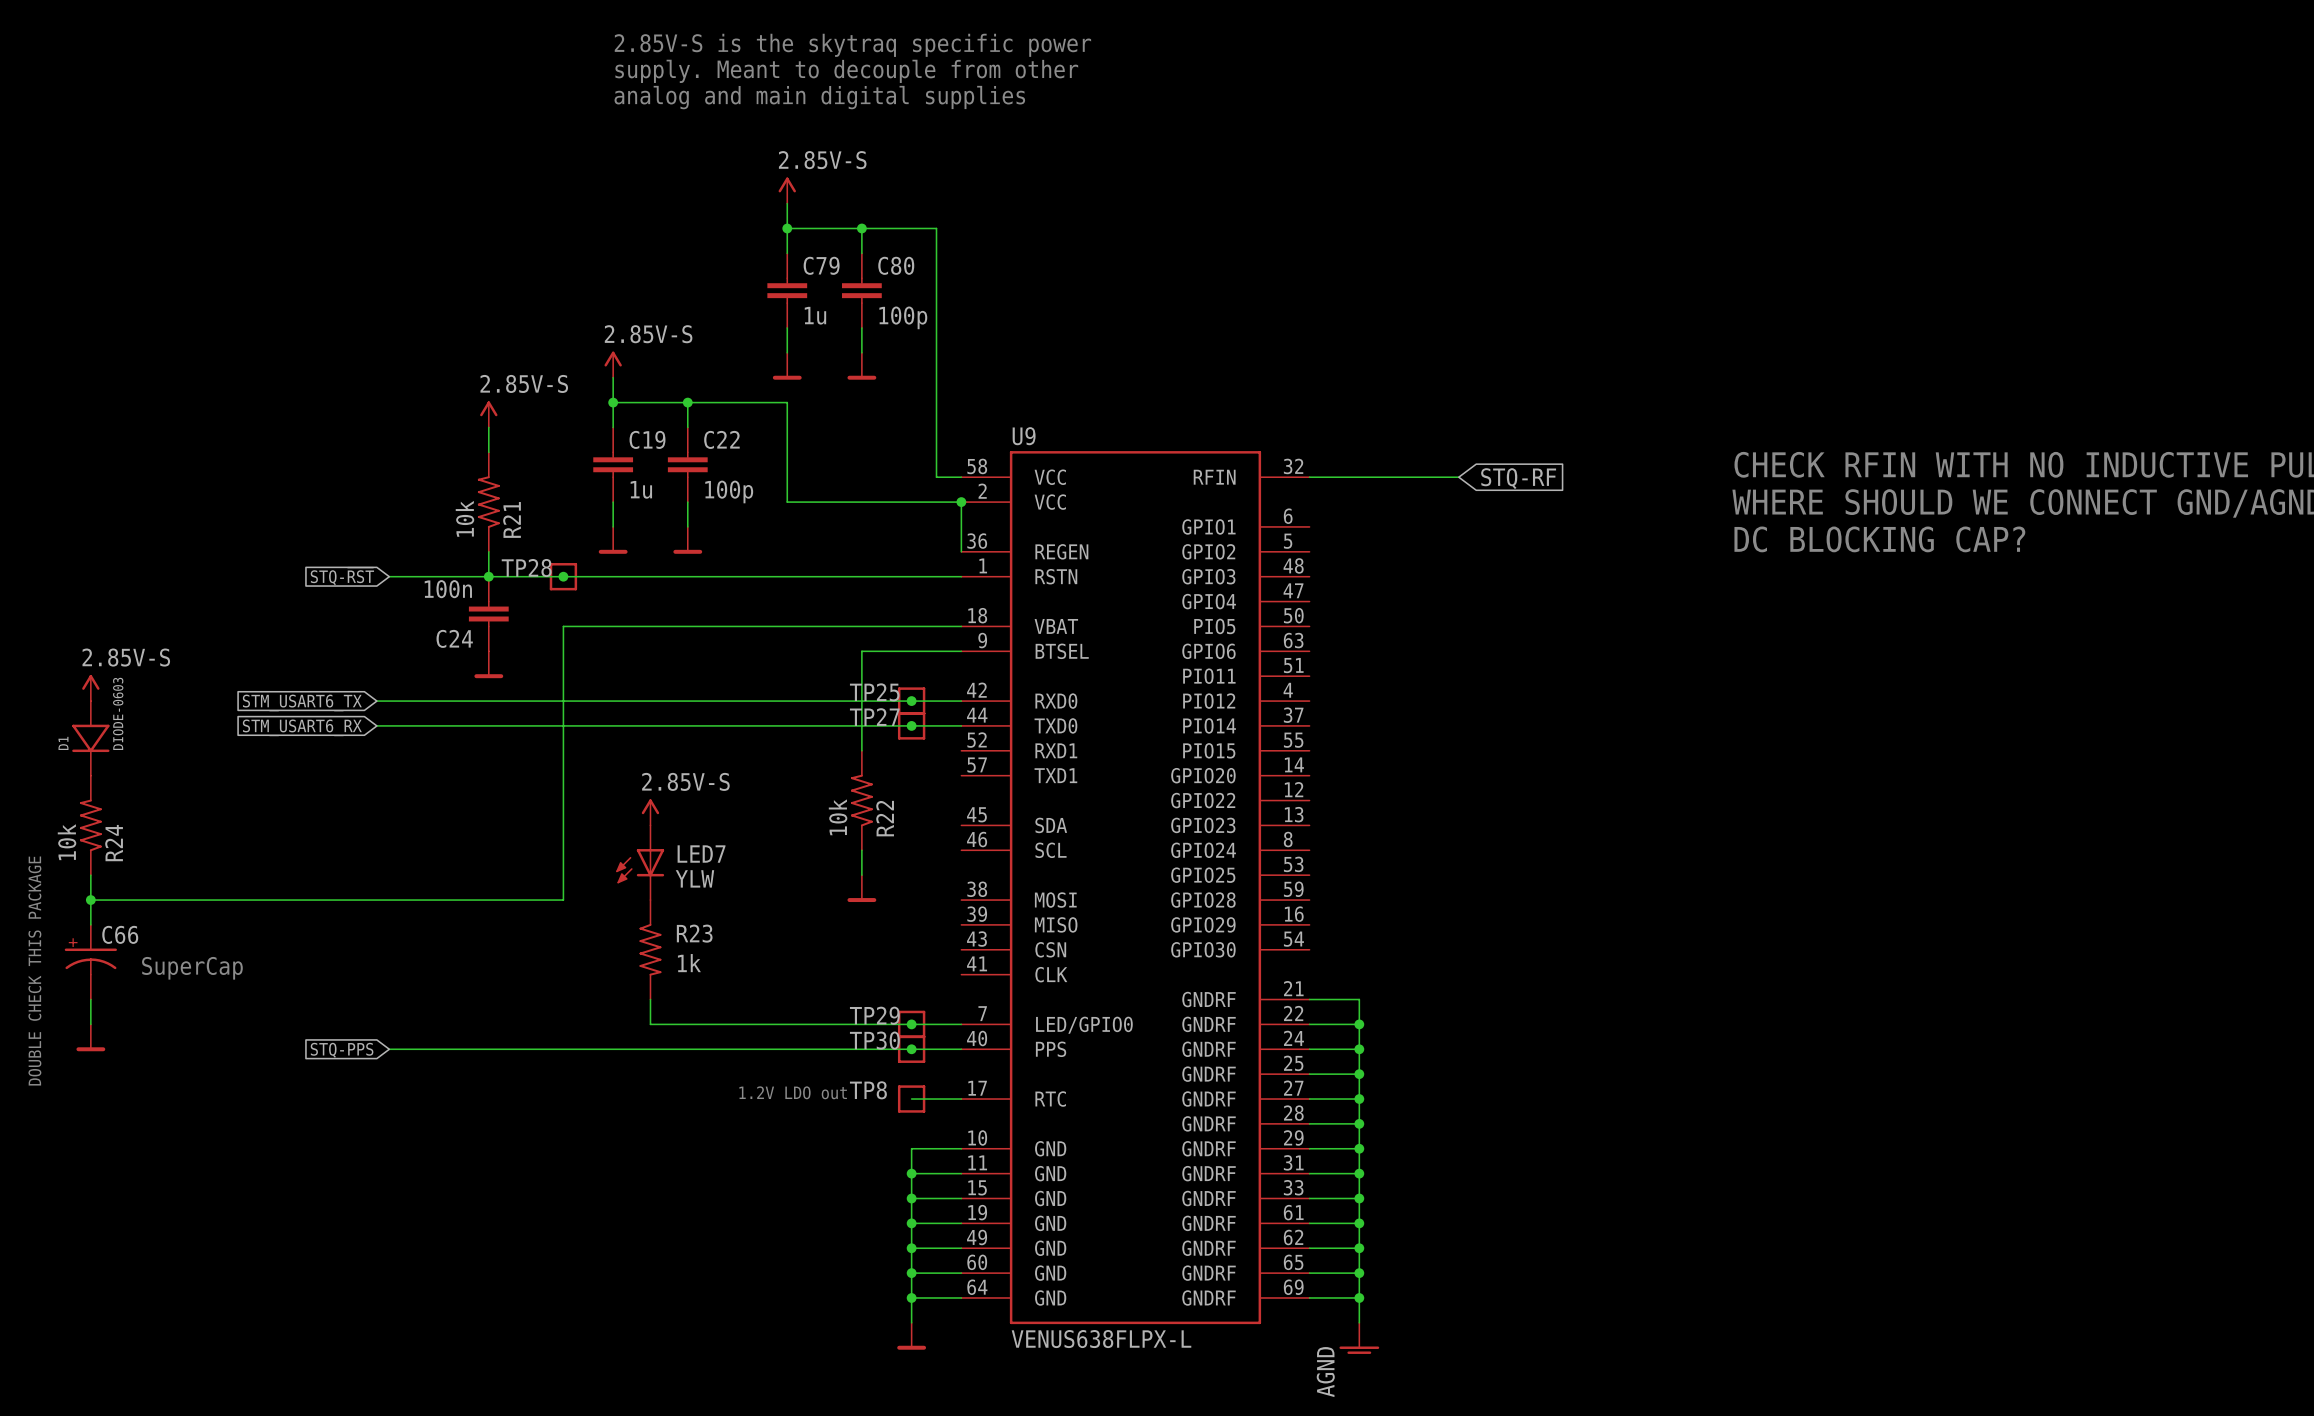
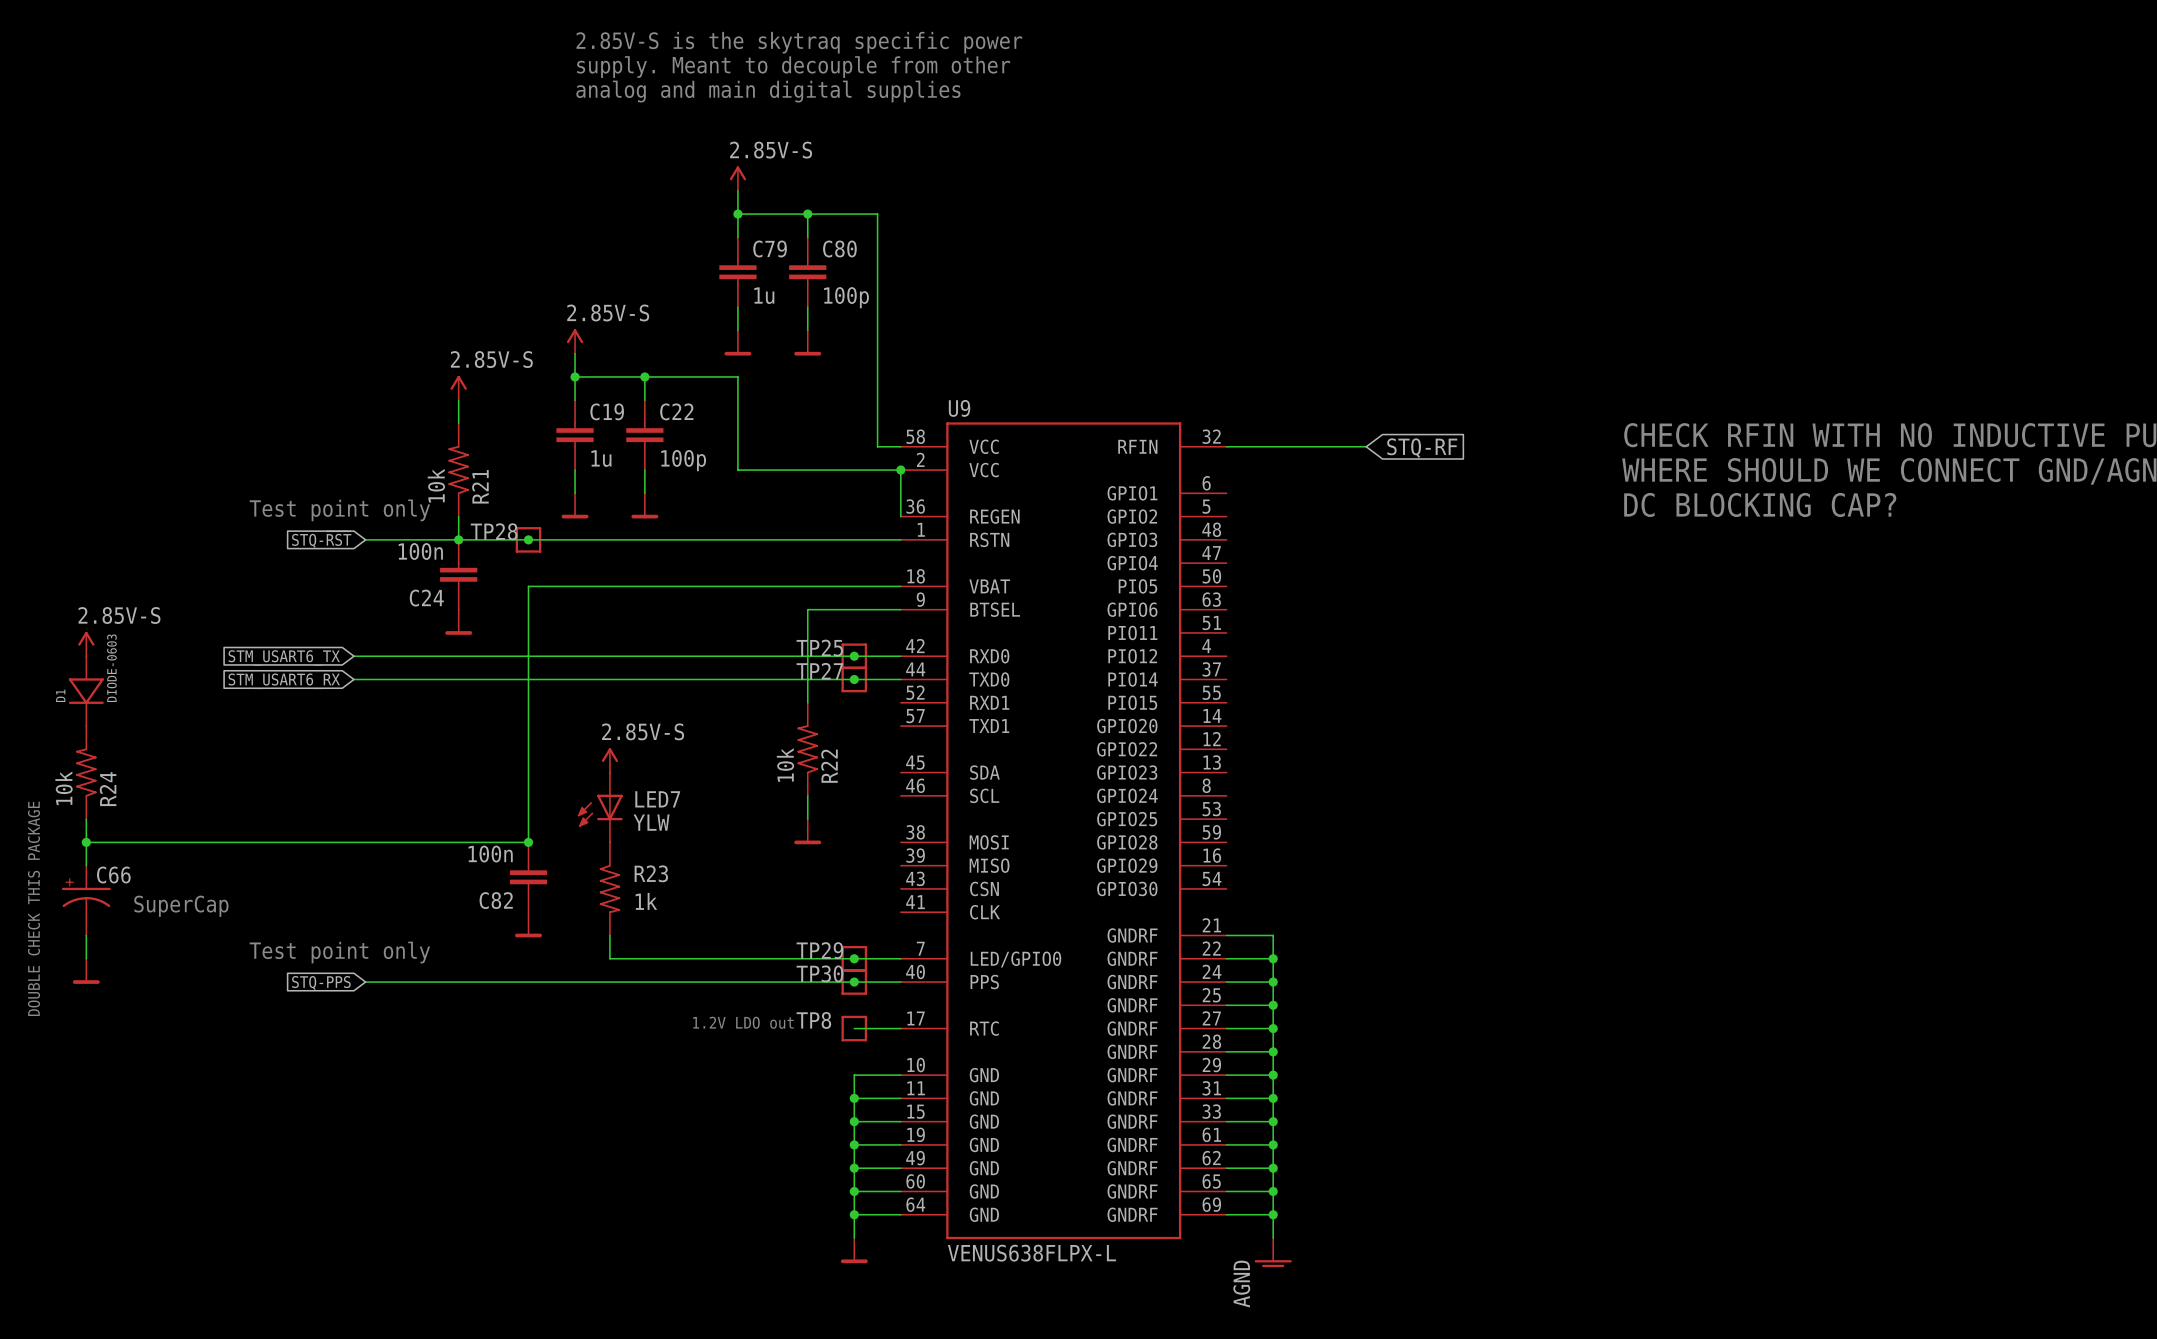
text: none -> Test point only (339, 510)
junction: none -> (528, 842)
C82: none -> 100n (528, 877)
power symbol: none -> (528, 924)
text: none -> Test point only (339, 952)

